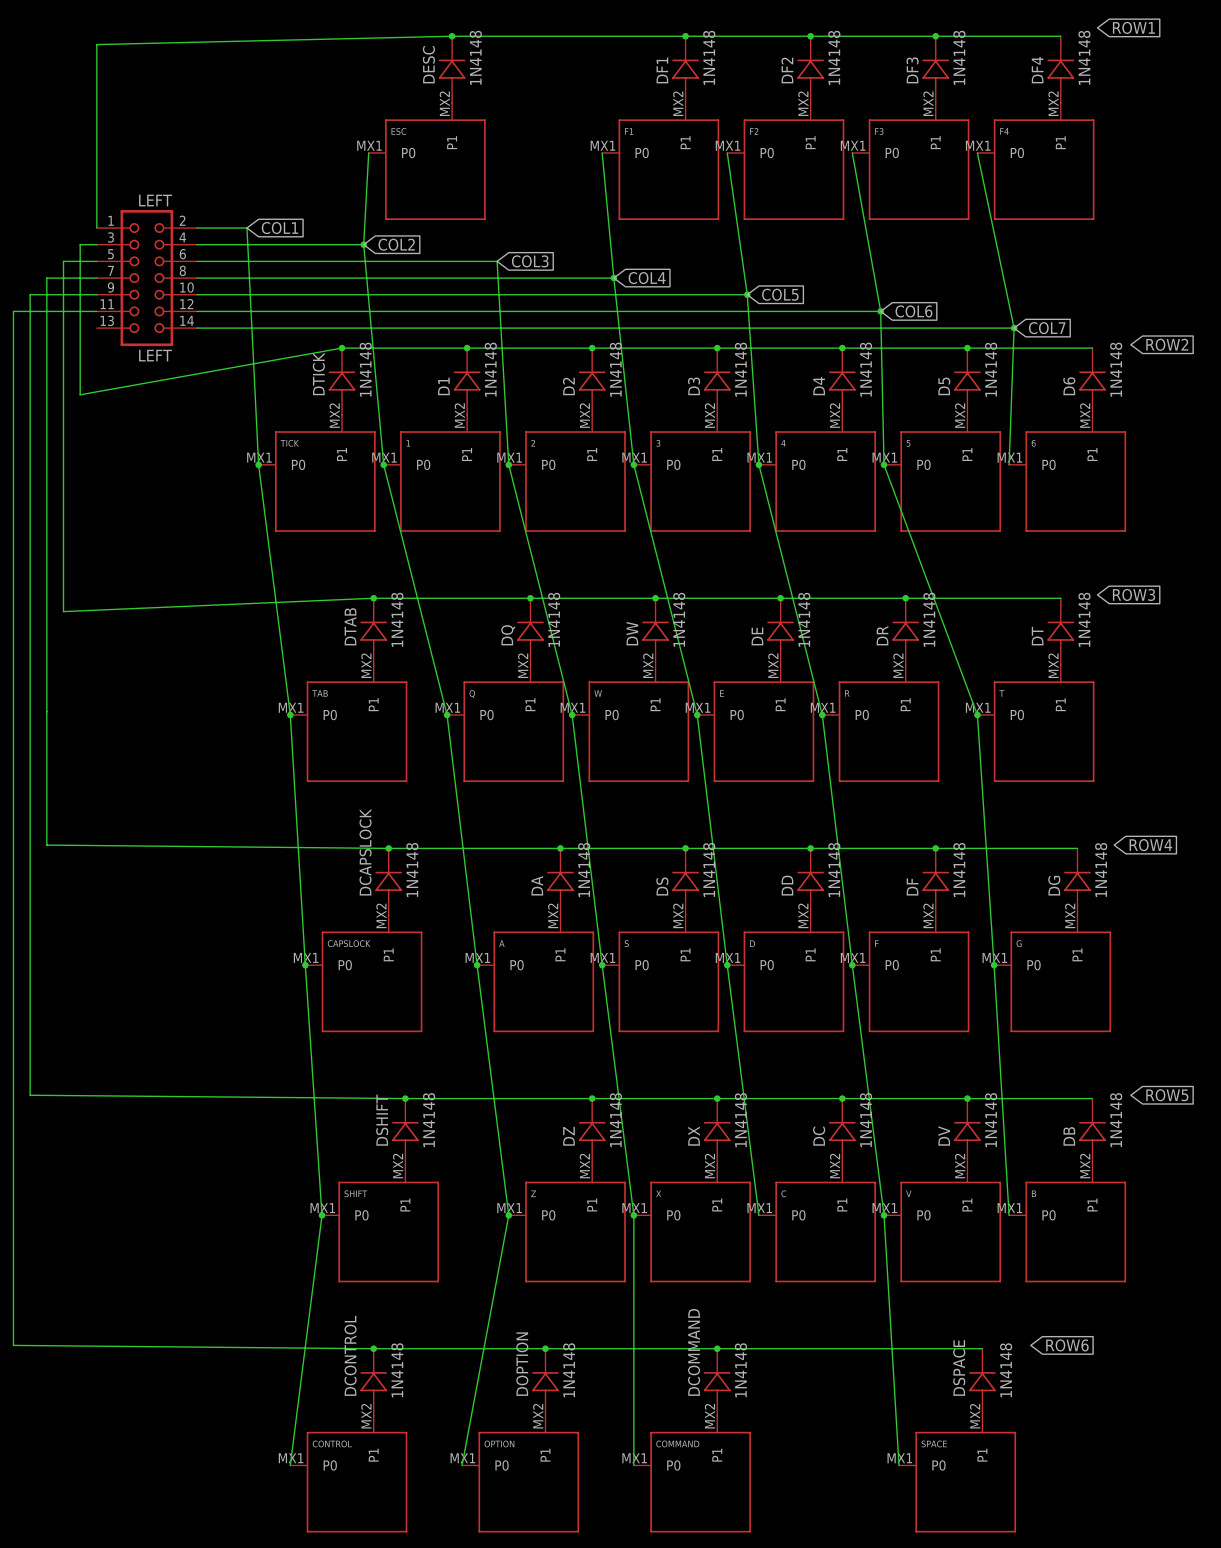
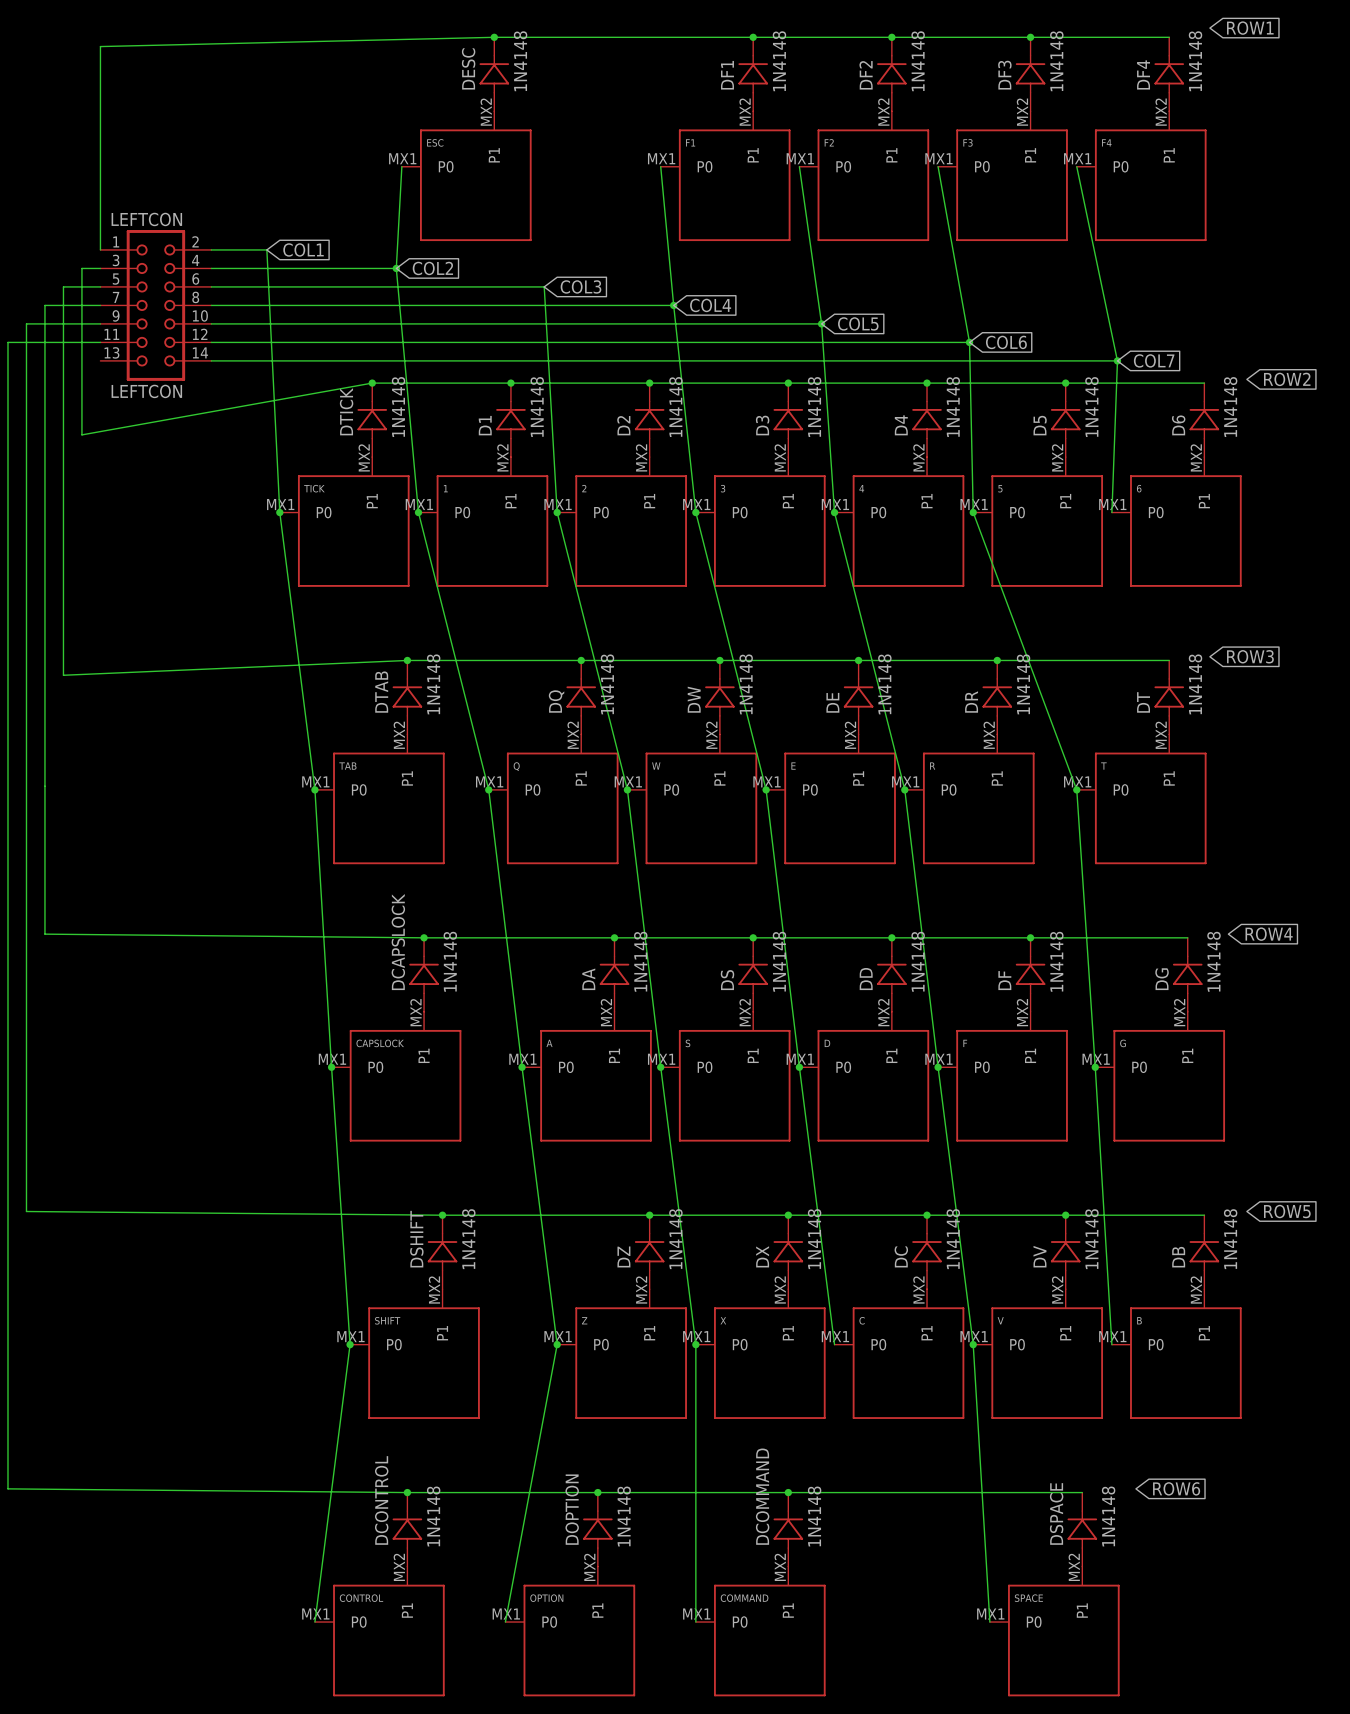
LEFT value: LEFT (155, 200) -> LEFTCON (146, 219)
LEFT name: LEFT (155, 355) -> LEFTCON (146, 391)

